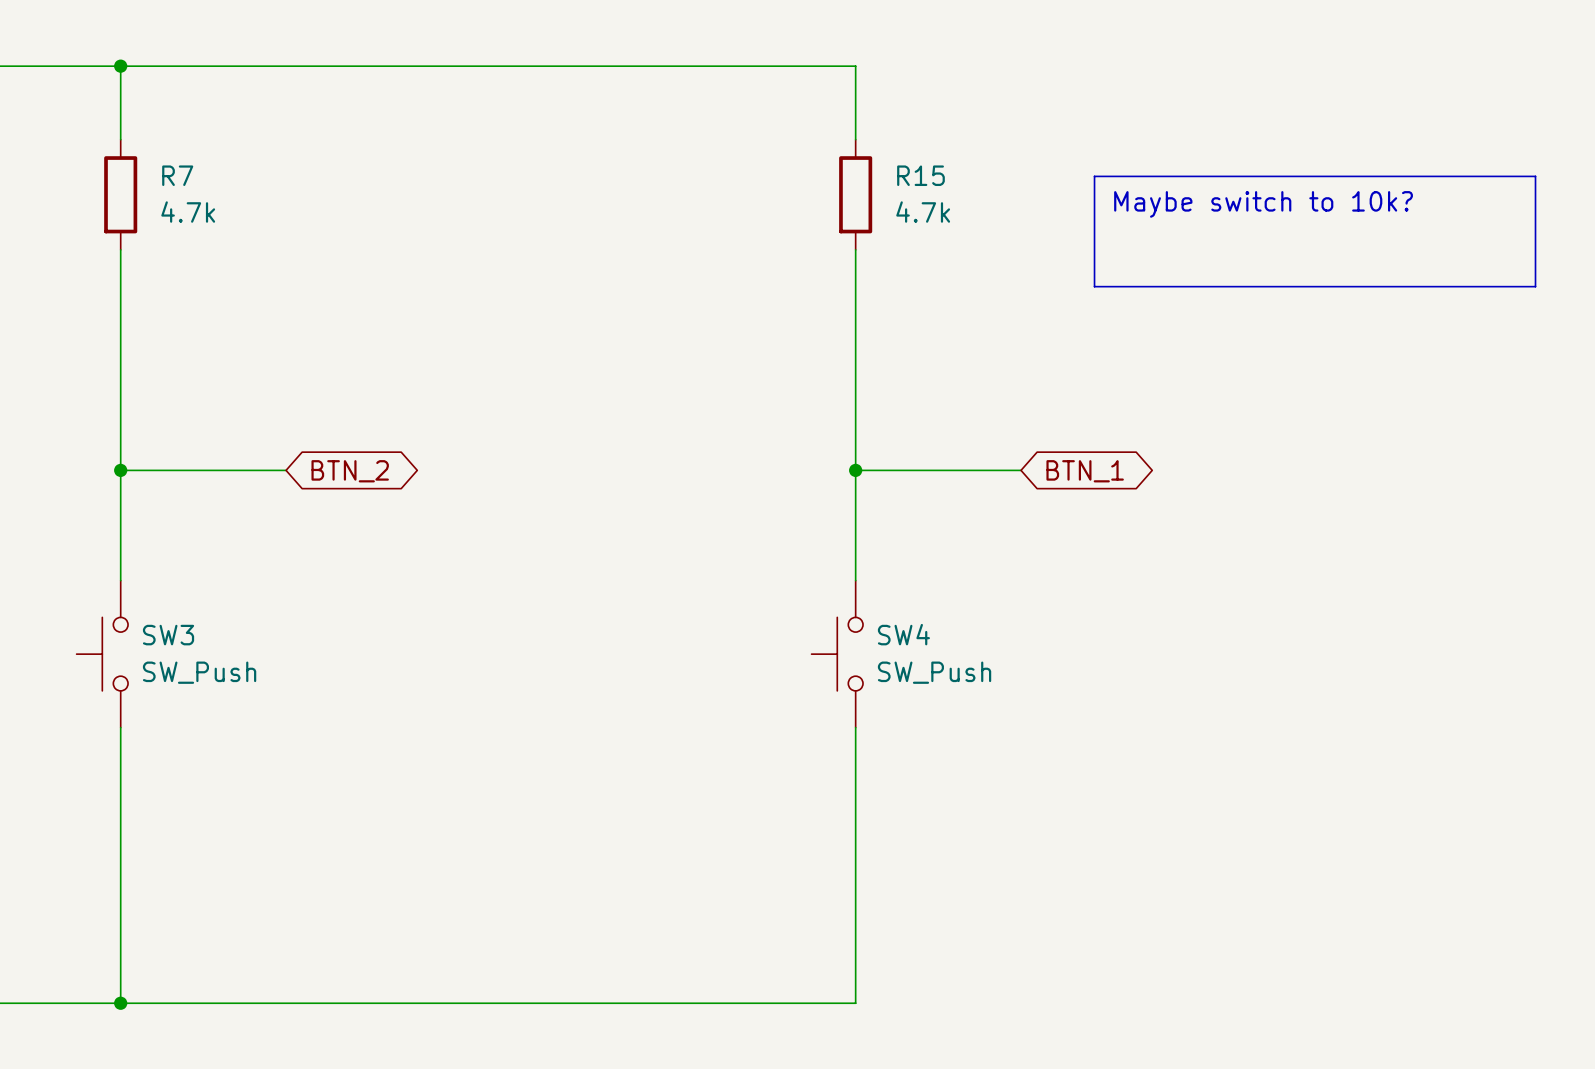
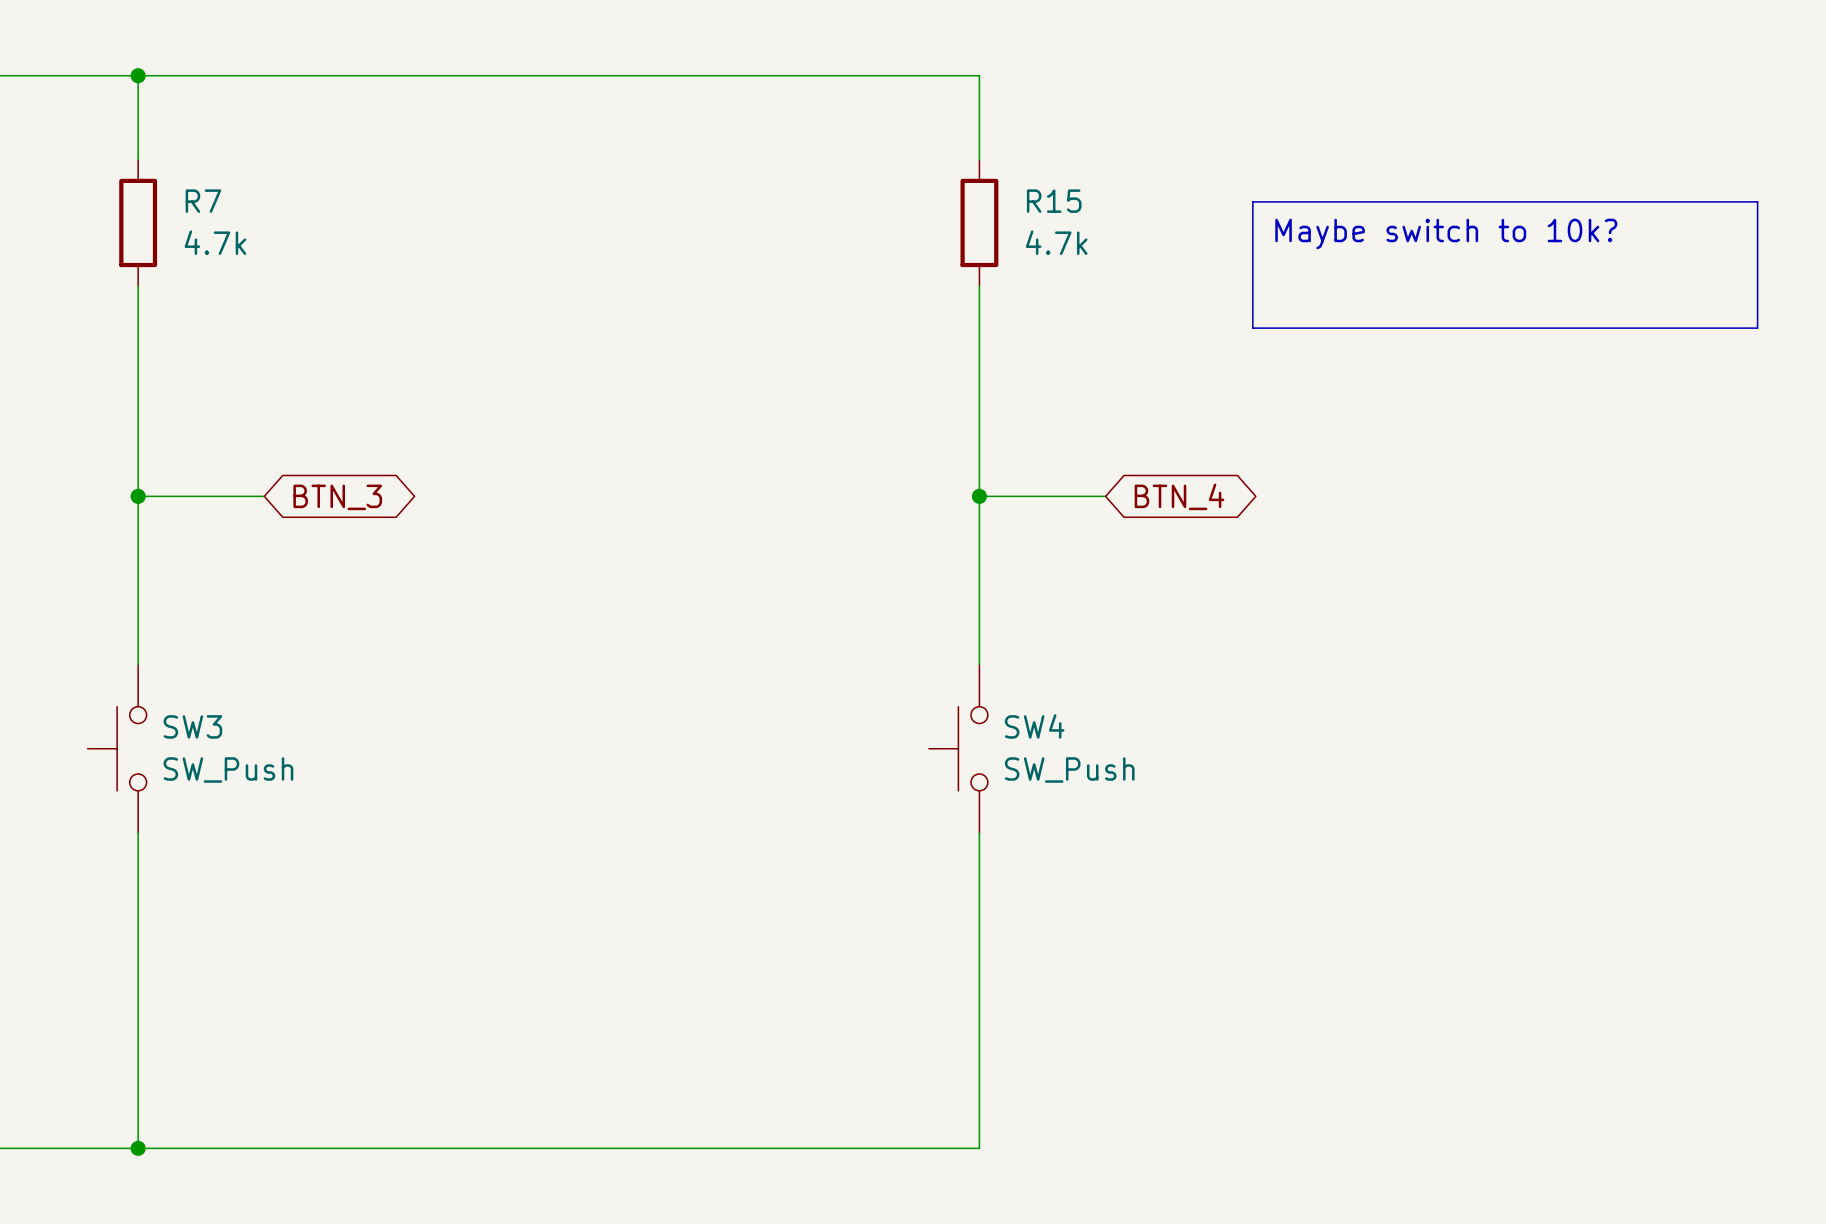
wire: none -> (138, 496) (264, 496)
wire: none -> (979, 496) (1105, 496)
wire: (120, 470) (286, 470) -> none
junction position: (120, 470) -> (138, 496)
wire: (855, 470) (1021, 470) -> none
junction position: (855, 470) -> (979, 496)
global label: BTN_2 (350, 471) -> BTN_3 (337, 497)
global label: BTN_1 (1085, 471) -> BTN_4 (1179, 496)

